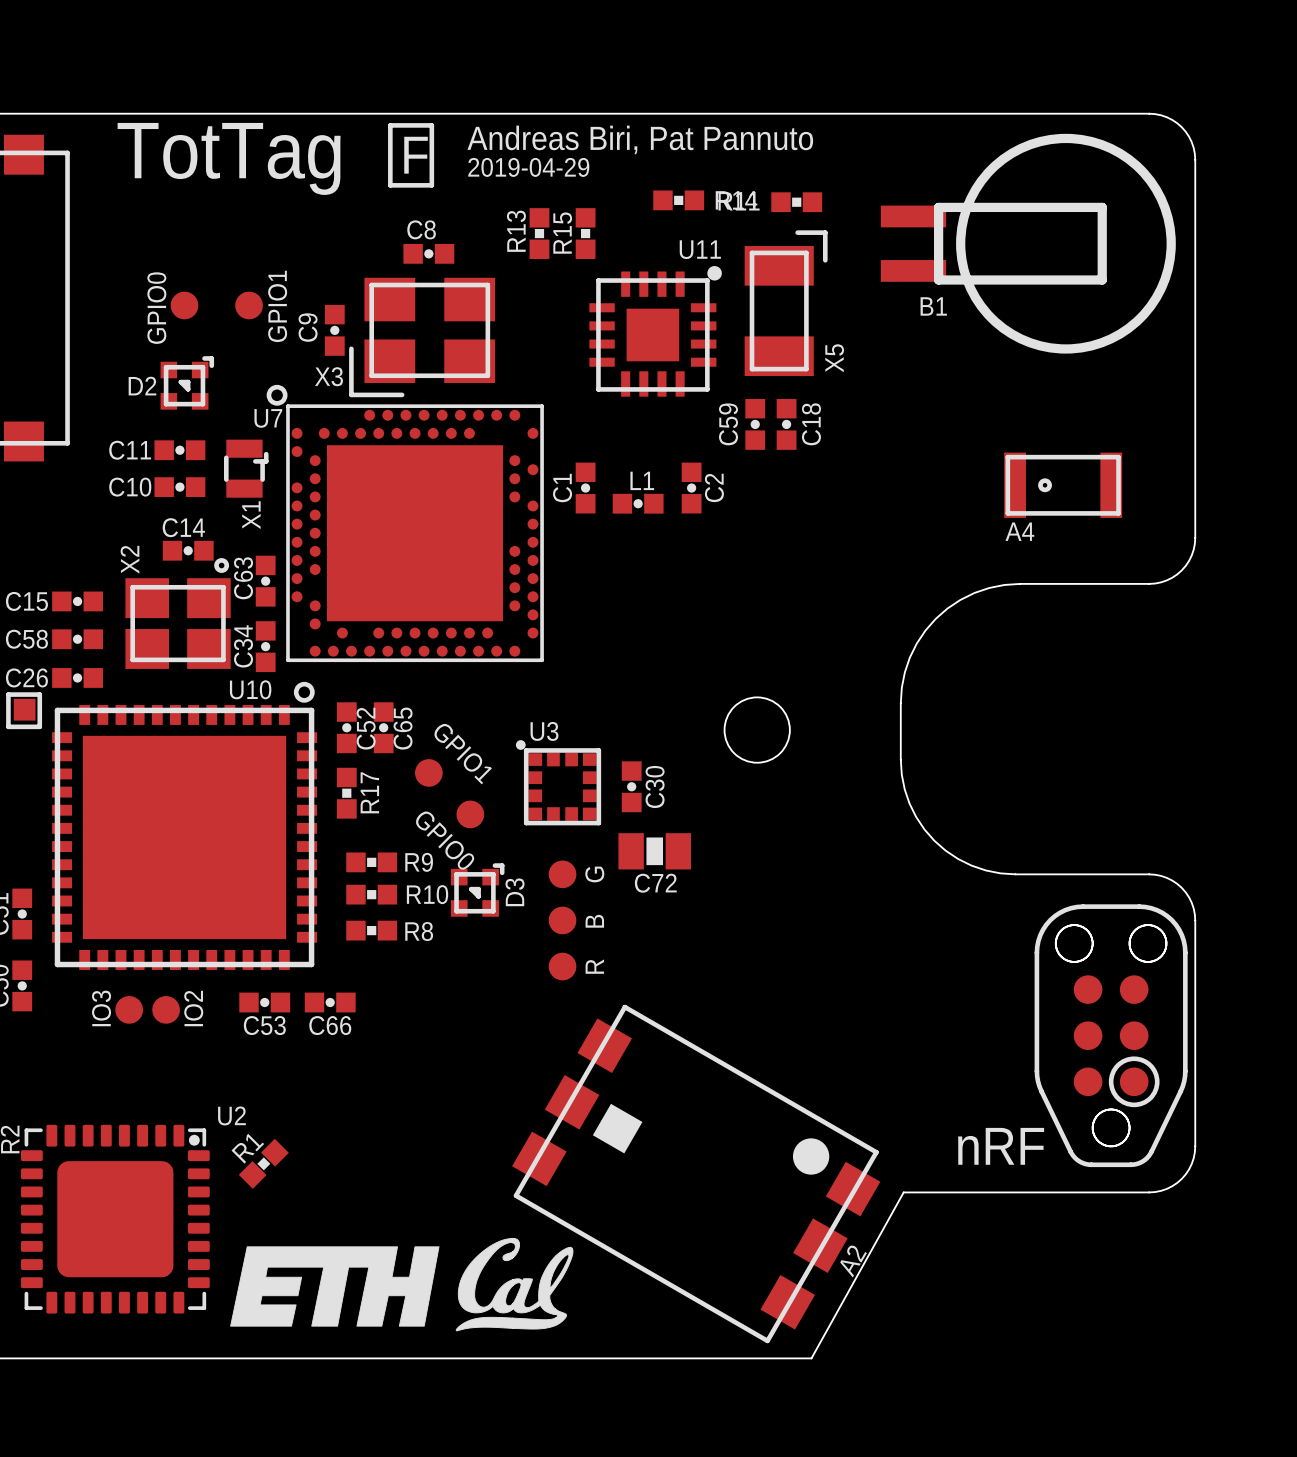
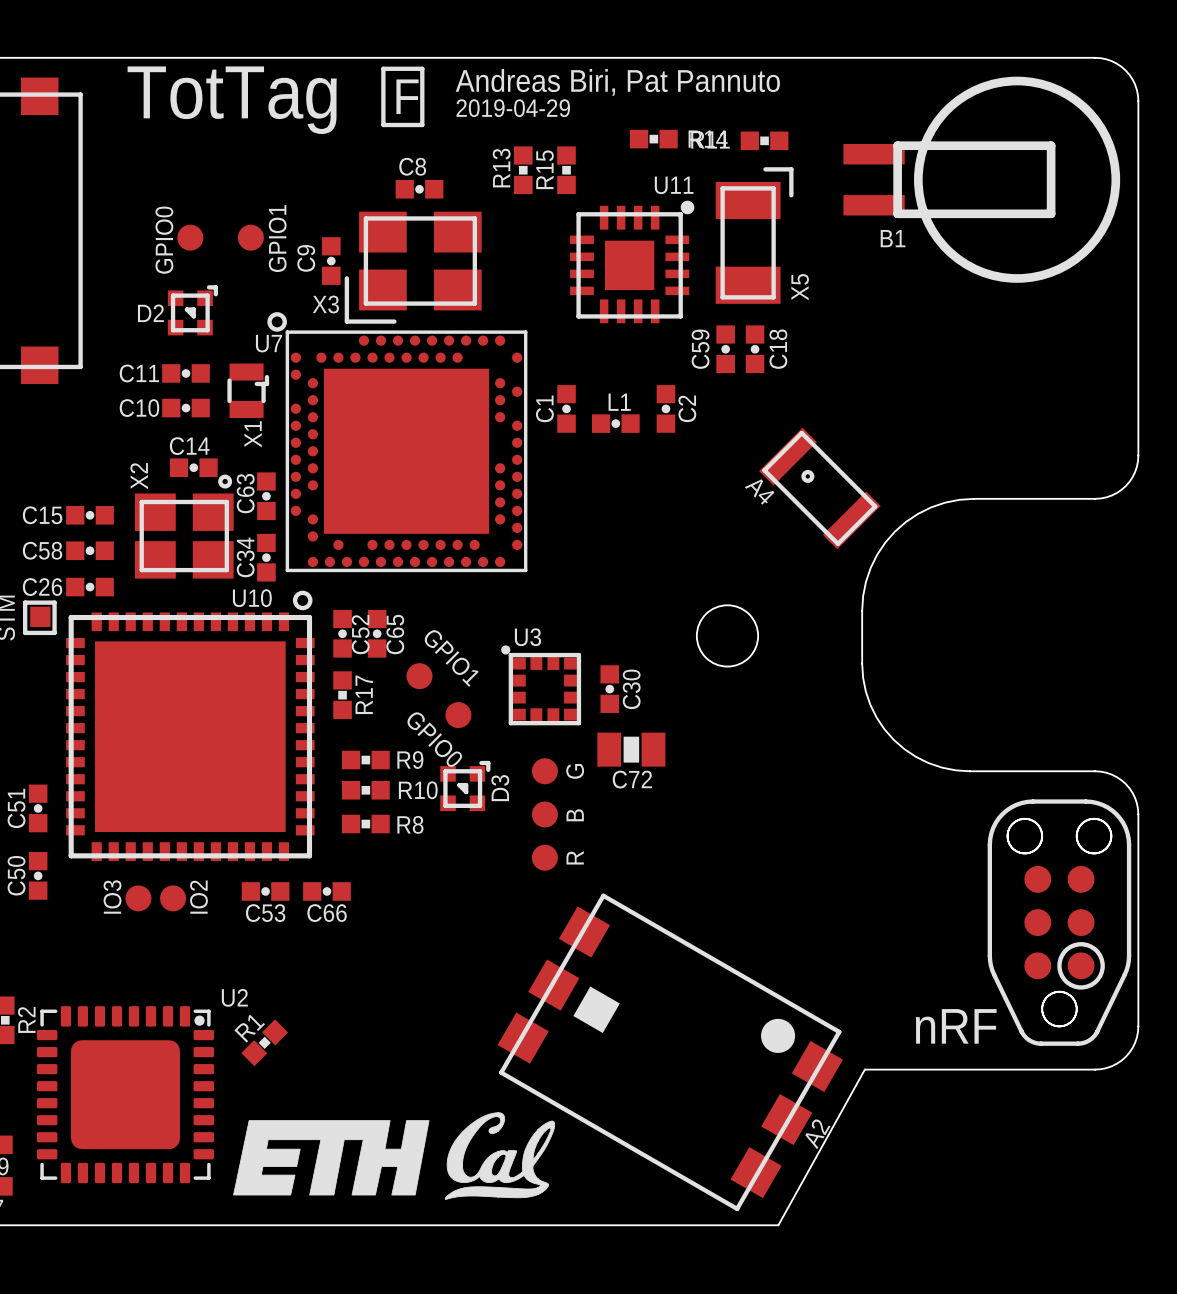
A4 rotation: 0° (1063, 485) -> 45° clockwise (819, 488)
A4 position: (1063, 485) -> (819, 488)

